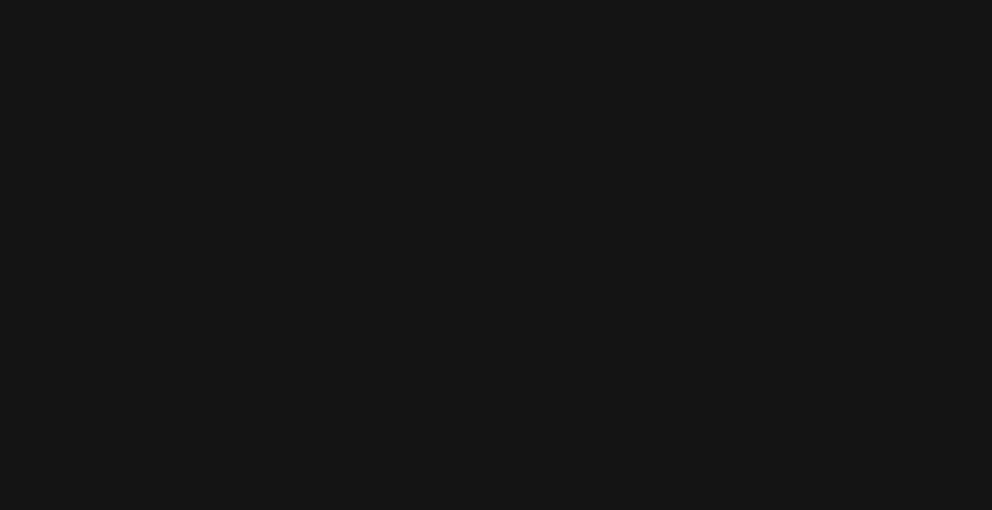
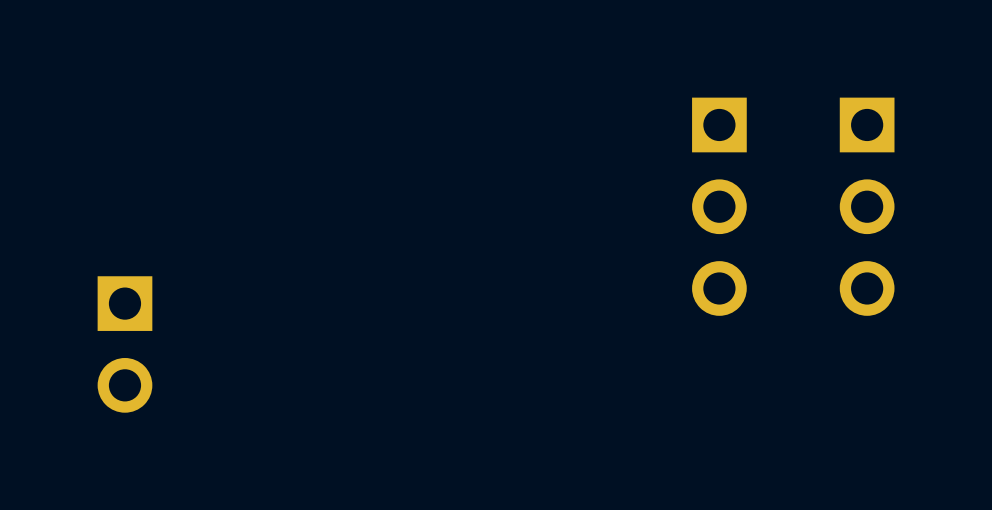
part: none -> (719, 206)
part: none -> (867, 206)
part: none -> (124, 344)

